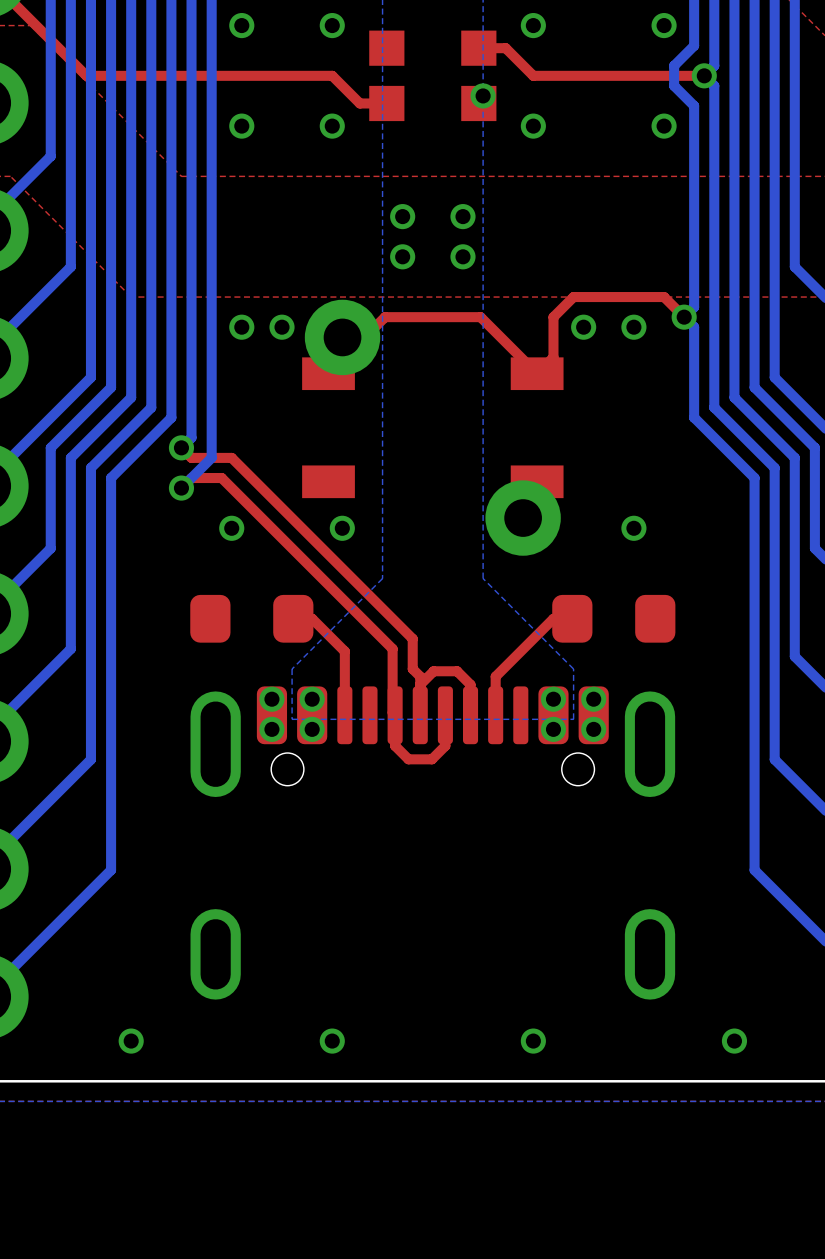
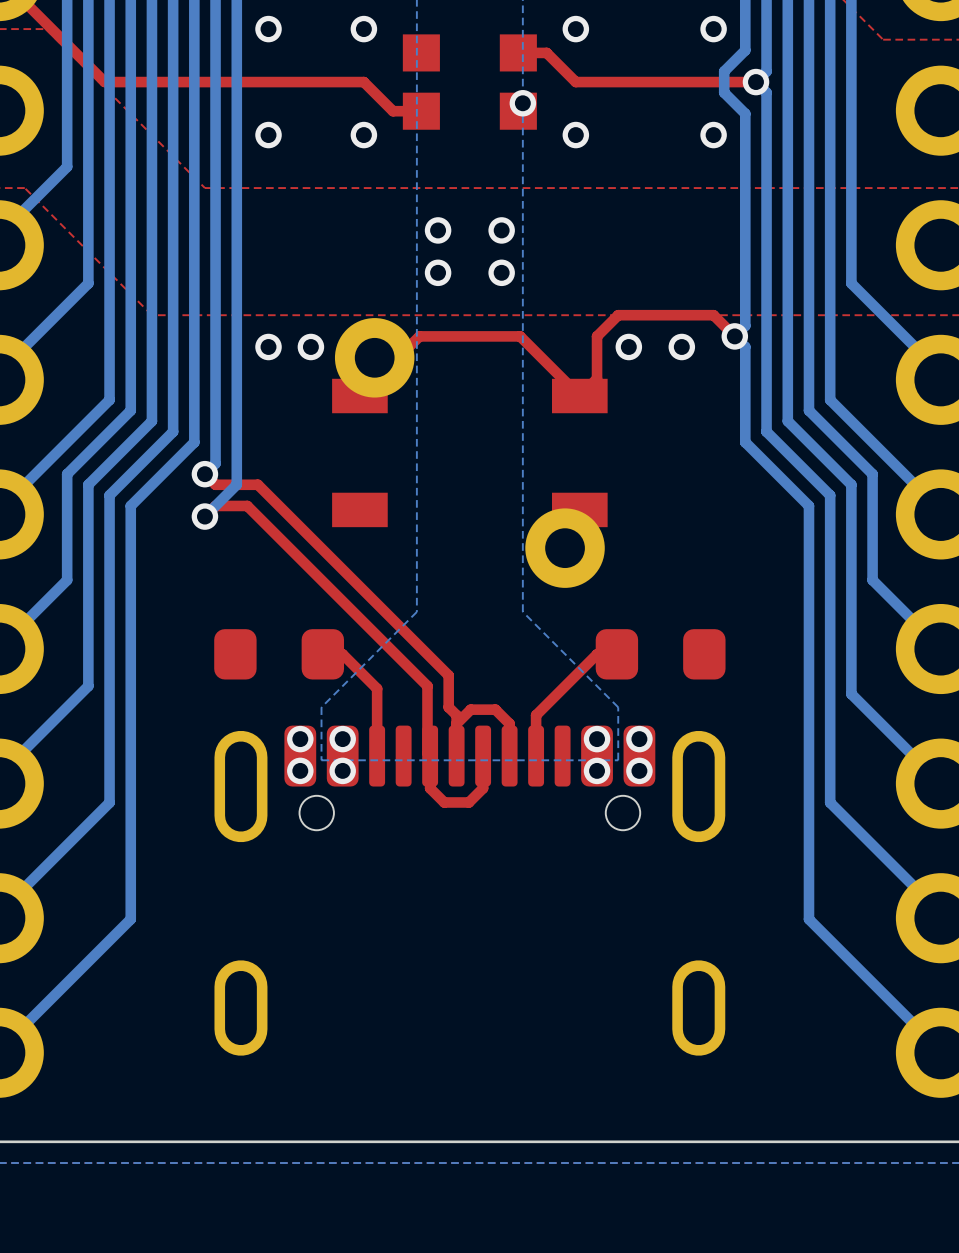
via: (231, 528) -> none
via: (342, 528) -> none
via: (633, 528) -> none
via: (131, 1041) -> none
via: (332, 1041) -> none
via: (533, 1041) -> none
via: (734, 1041) -> none

